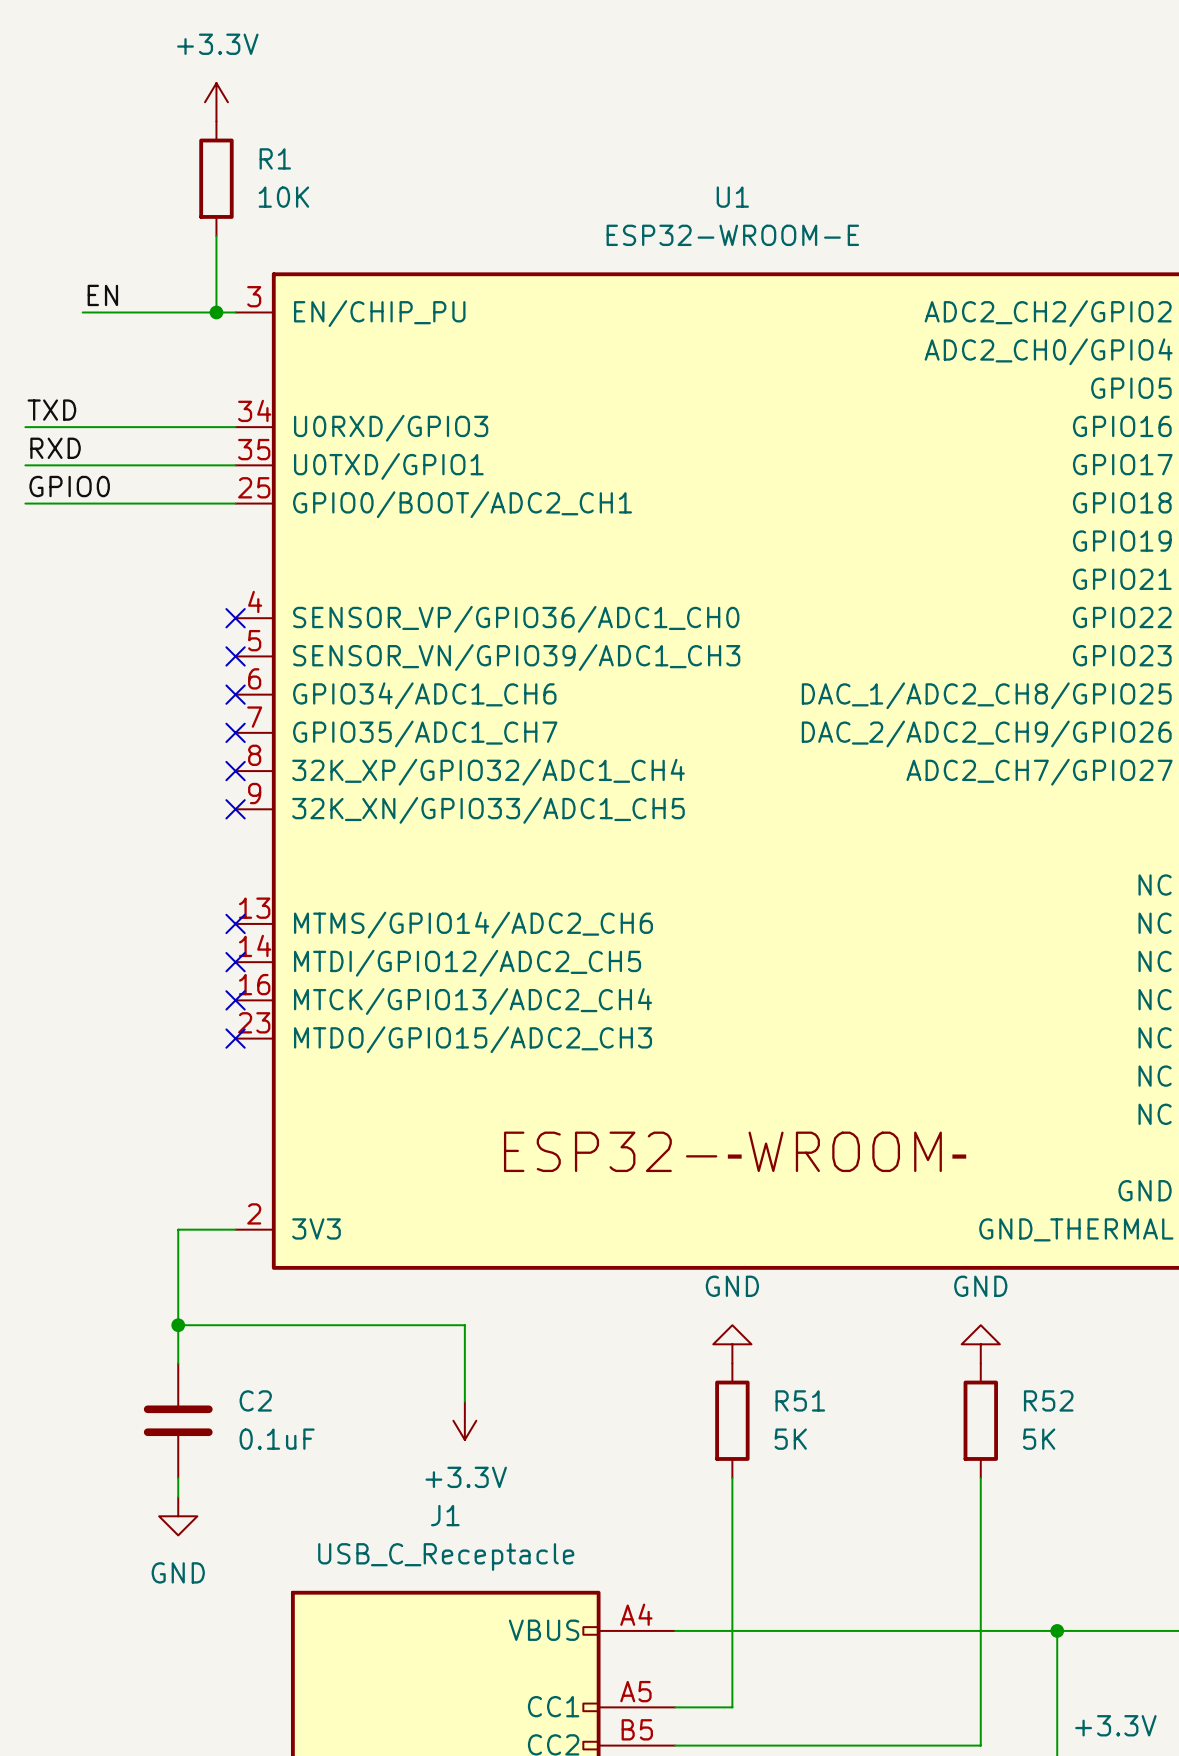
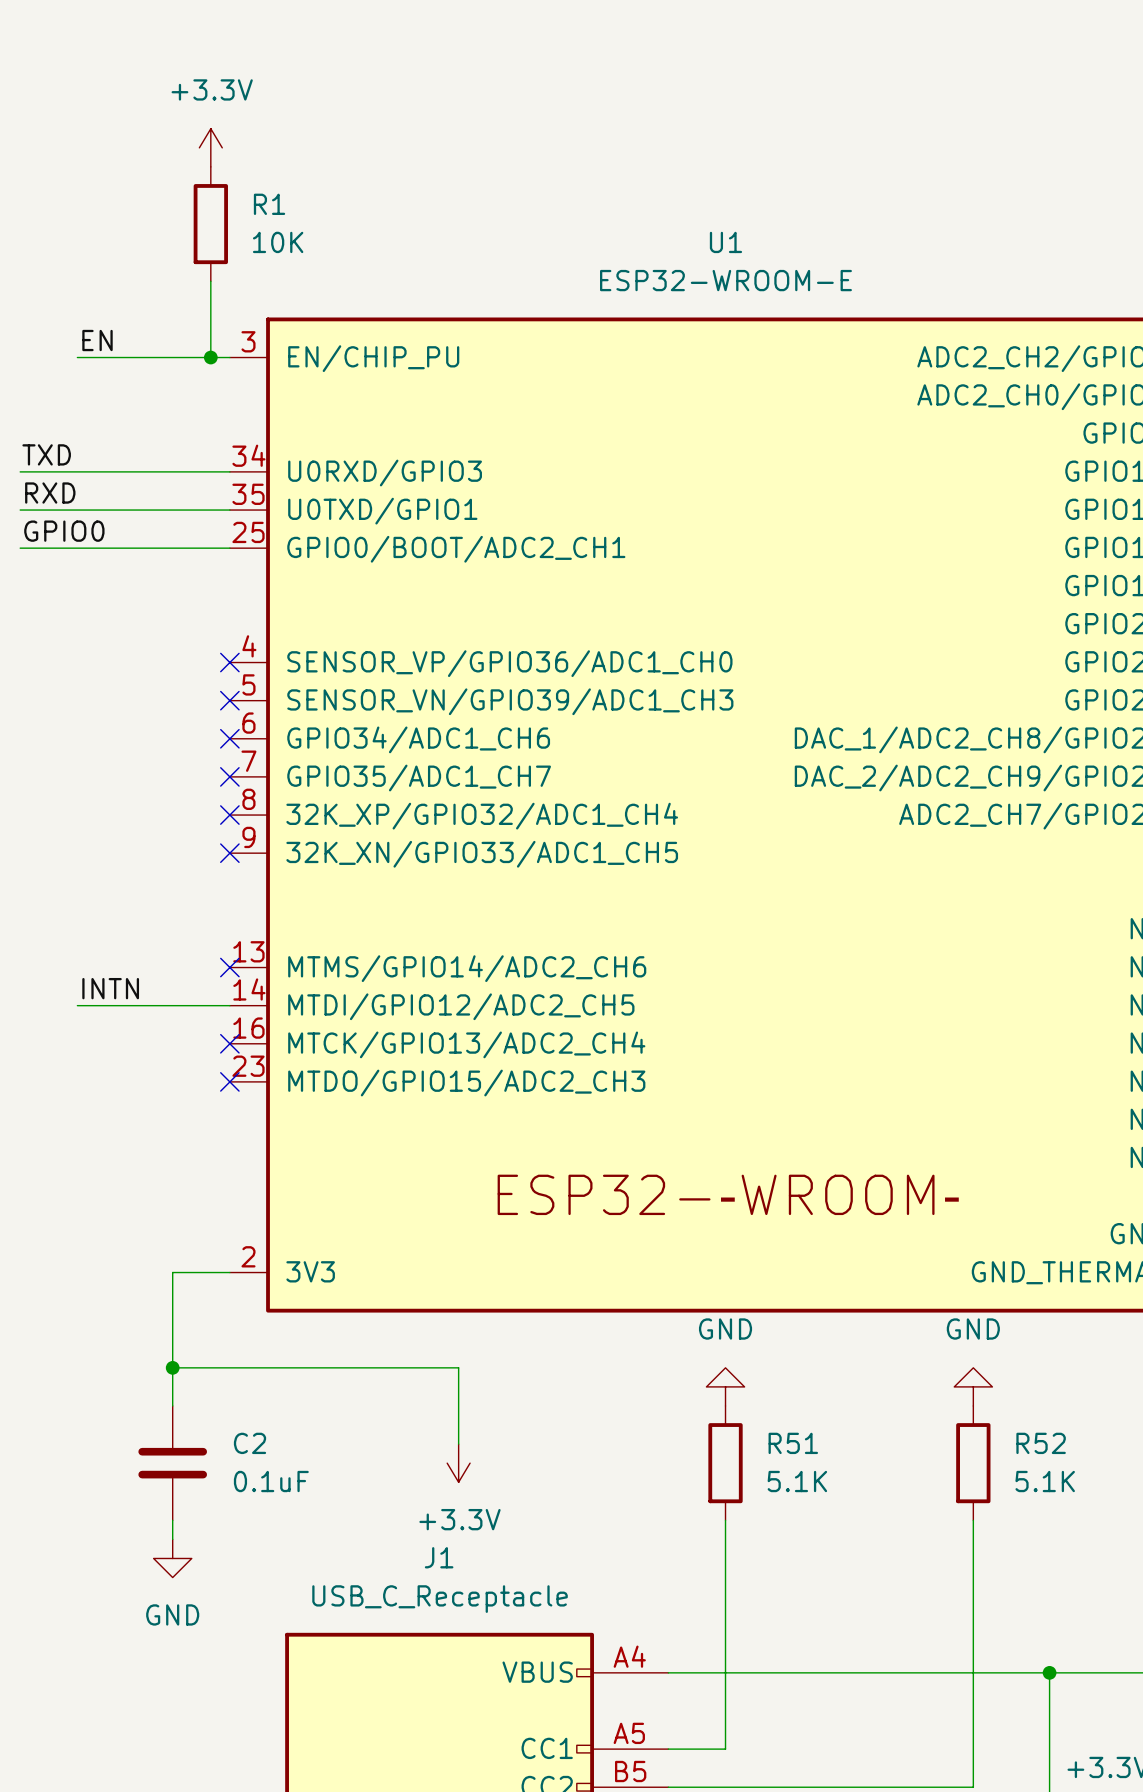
label: none -> INTN (110, 988)
wire: none -> (77, 1005) (229, 1005)
no-connect mark: (235, 962) -> none
R51 value: 5K (790, 1439) -> 5.1K (797, 1481)
R52 value: 5K (1039, 1439) -> 5.1K (1045, 1481)

